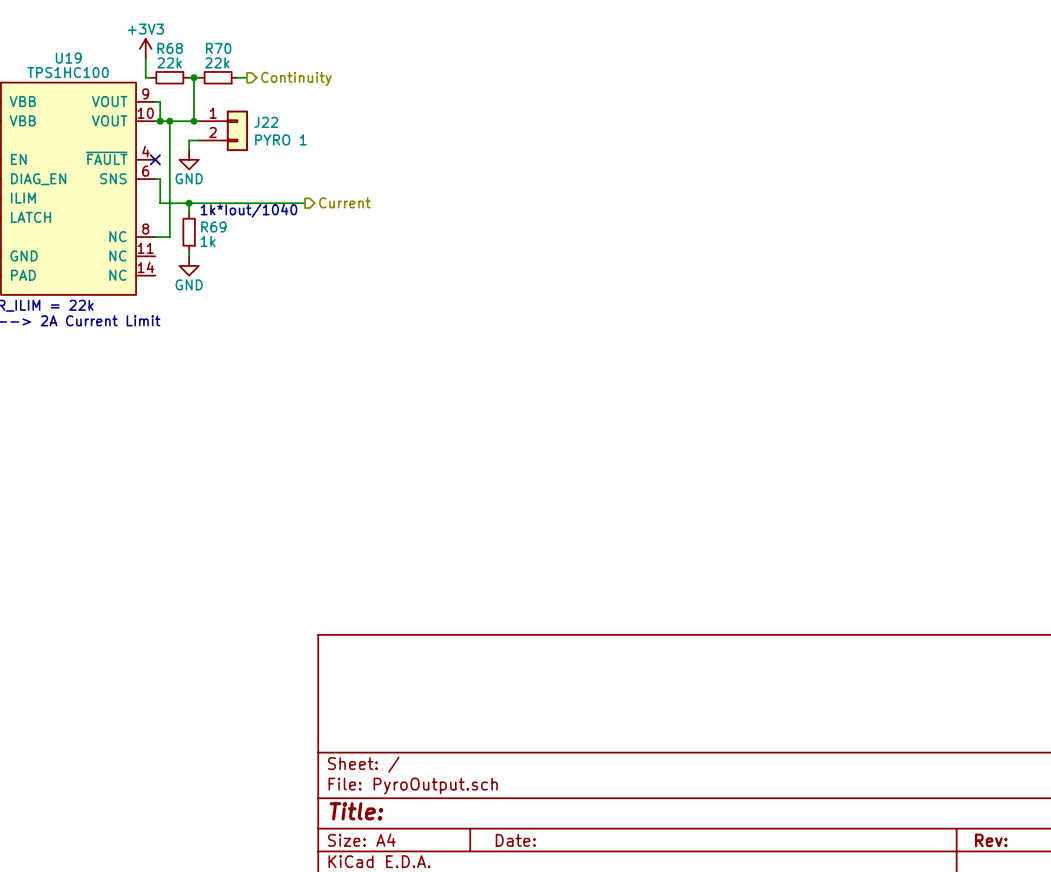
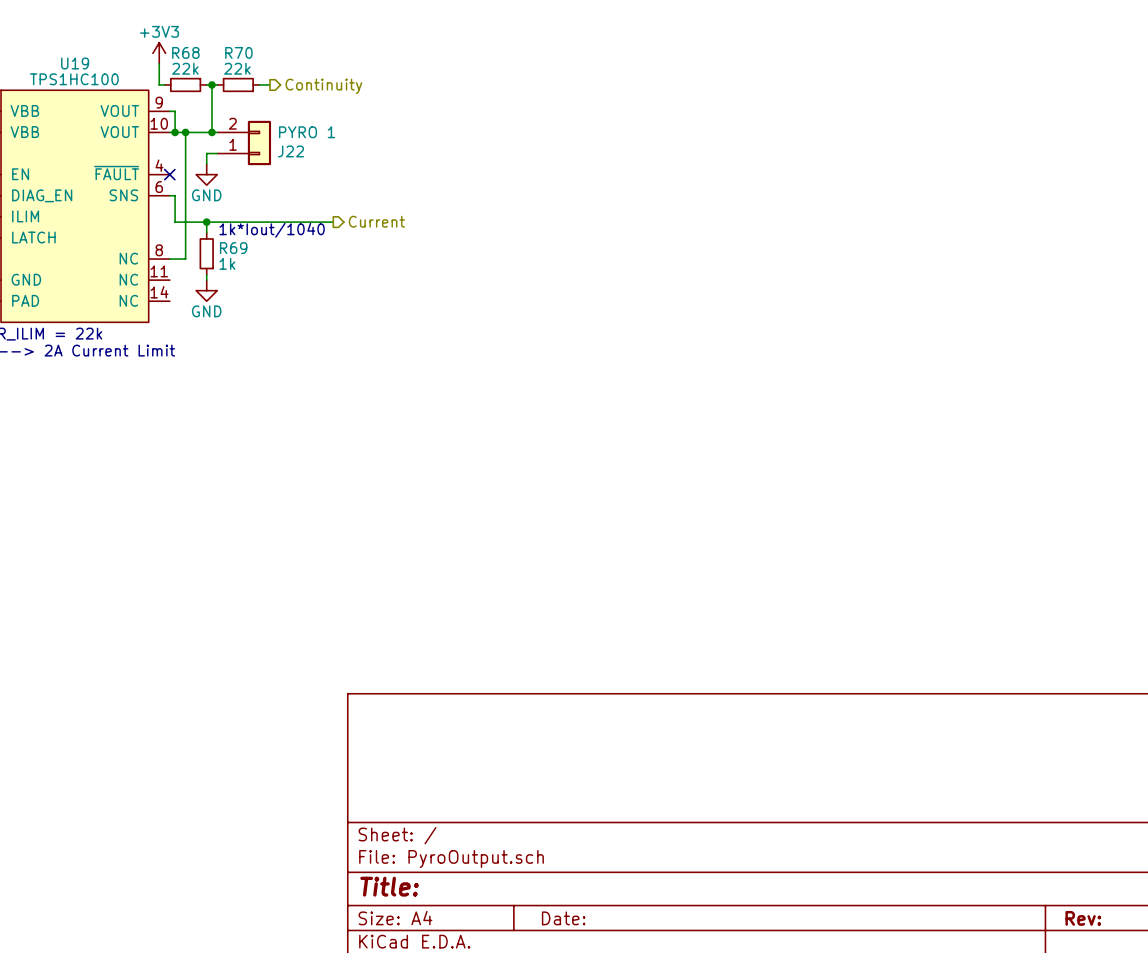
J22 flip: as is (237, 130) -> up-down (259, 142)

